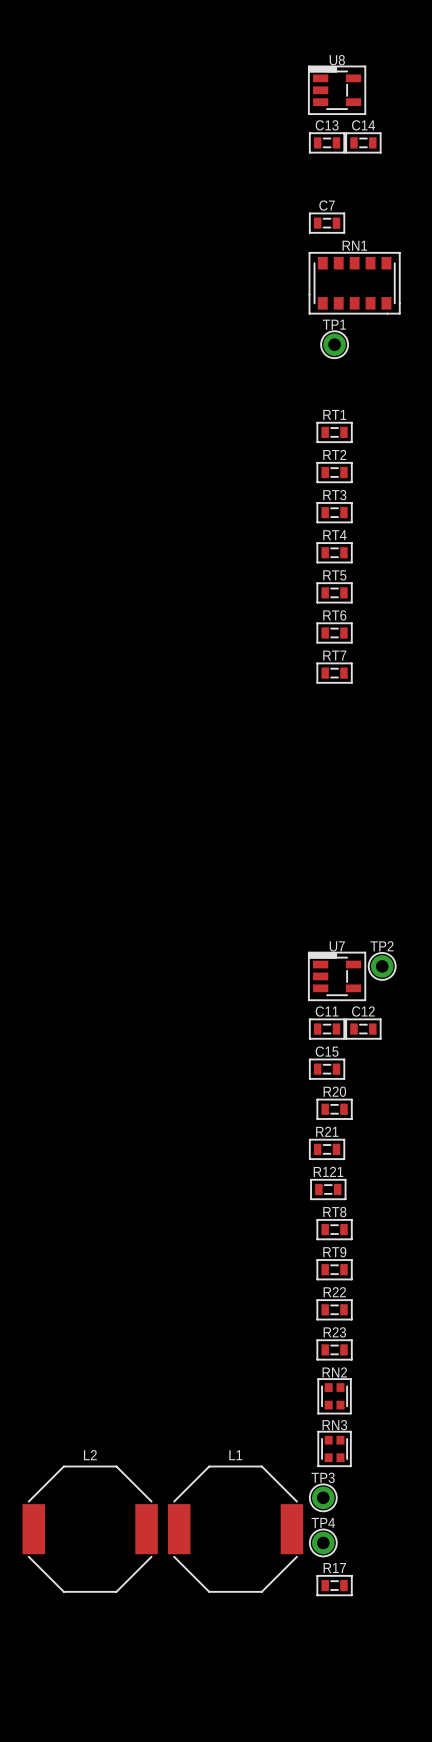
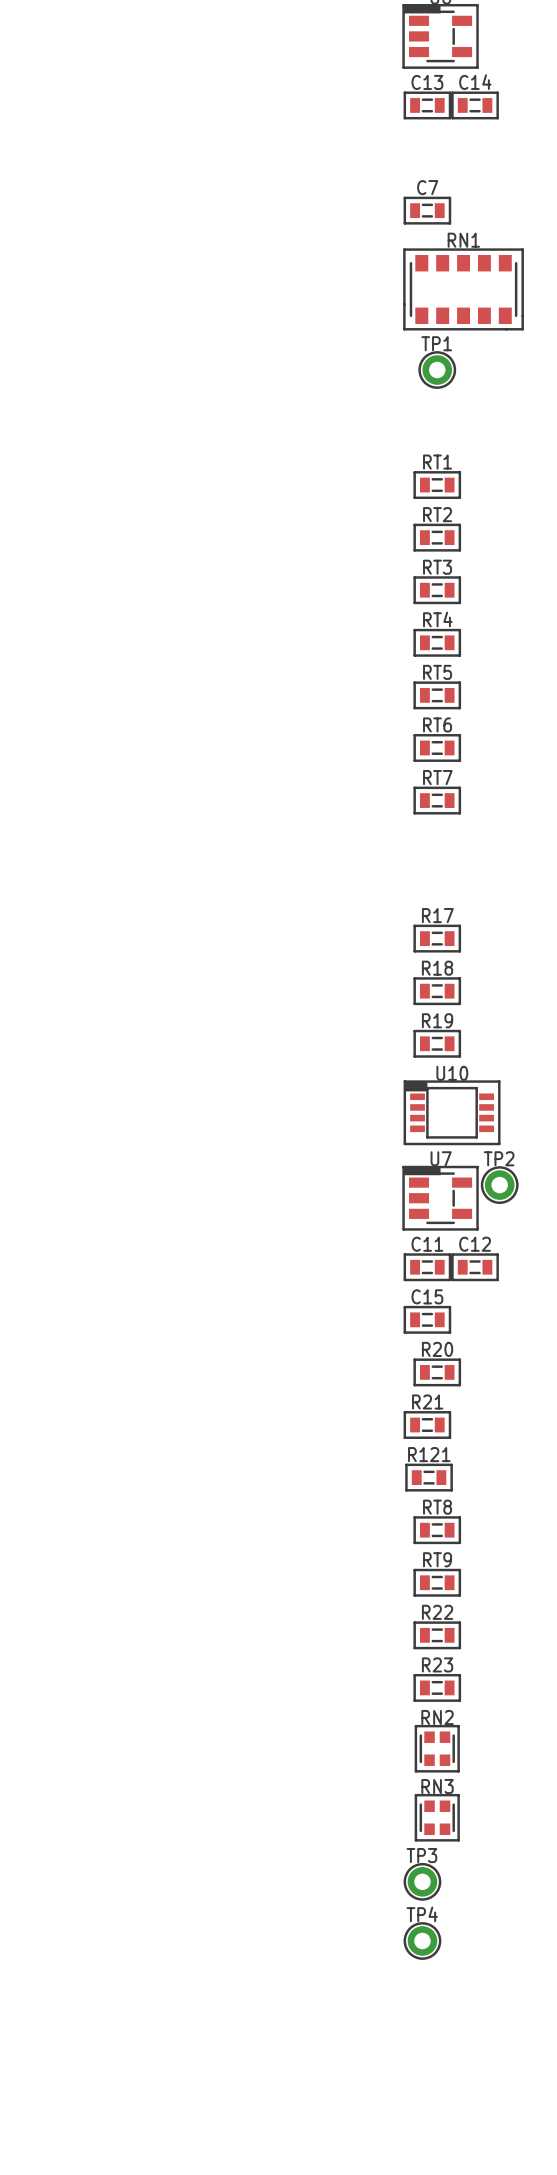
R18: none -> (437, 991)
R19: none -> (437, 1043)
U10: none -> (452, 1112)
L2: (90, 1529) -> none
L1: (235, 1529) -> none
R17 position: (334, 1585) -> (437, 938)

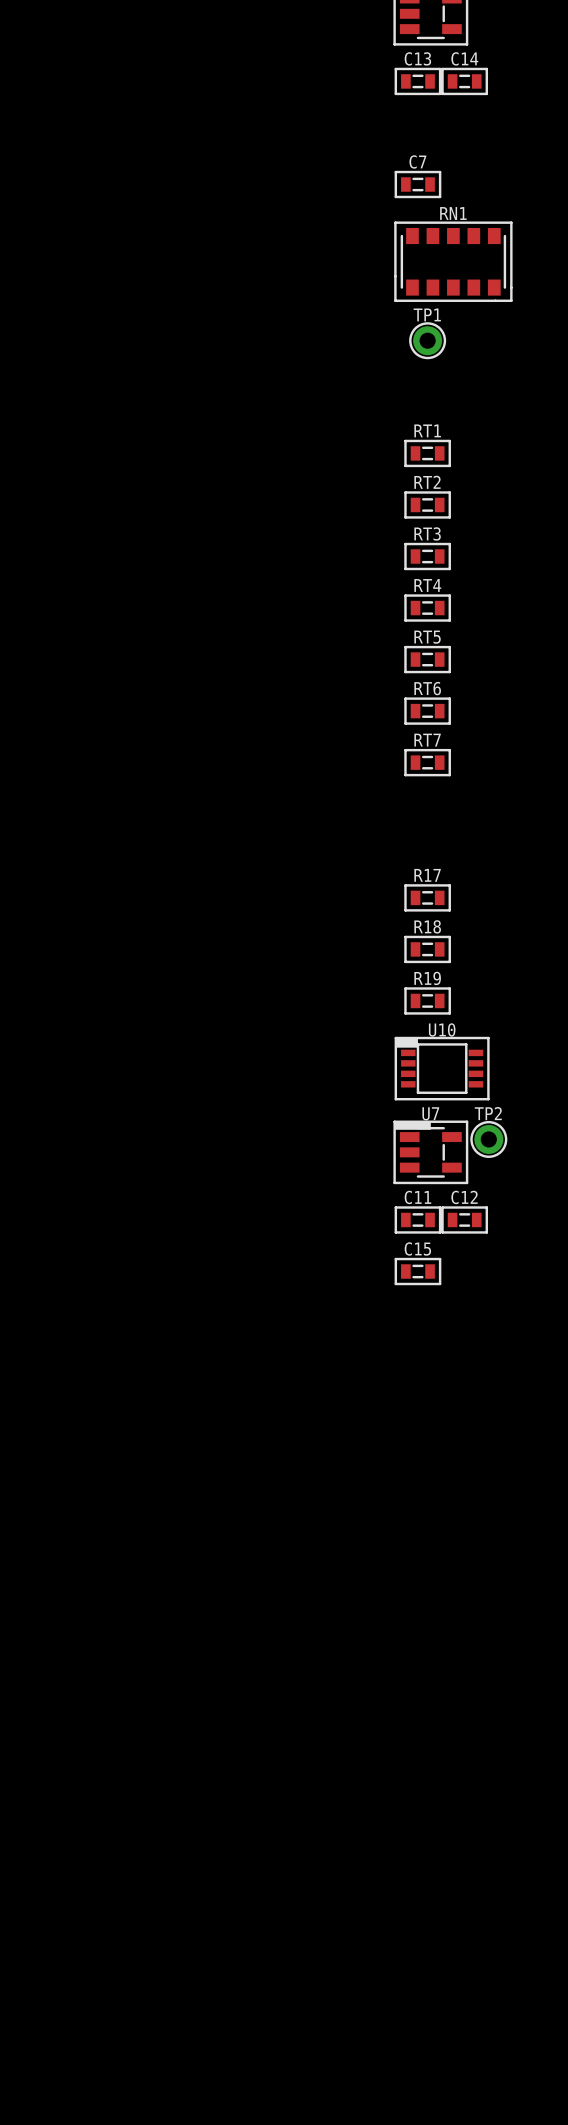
R20: (437, 1372) -> none
R21: (427, 1425) -> none
R121: (429, 1477) -> none
RT8: (437, 1530) -> none
RT9: (437, 1582) -> none
R22: (437, 1635) -> none
R23: (437, 1687) -> none
RN2: (437, 1748) -> none
RN3: (437, 1817) -> none
TP3: (422, 1881) -> none
TP4: (422, 1940) -> none

